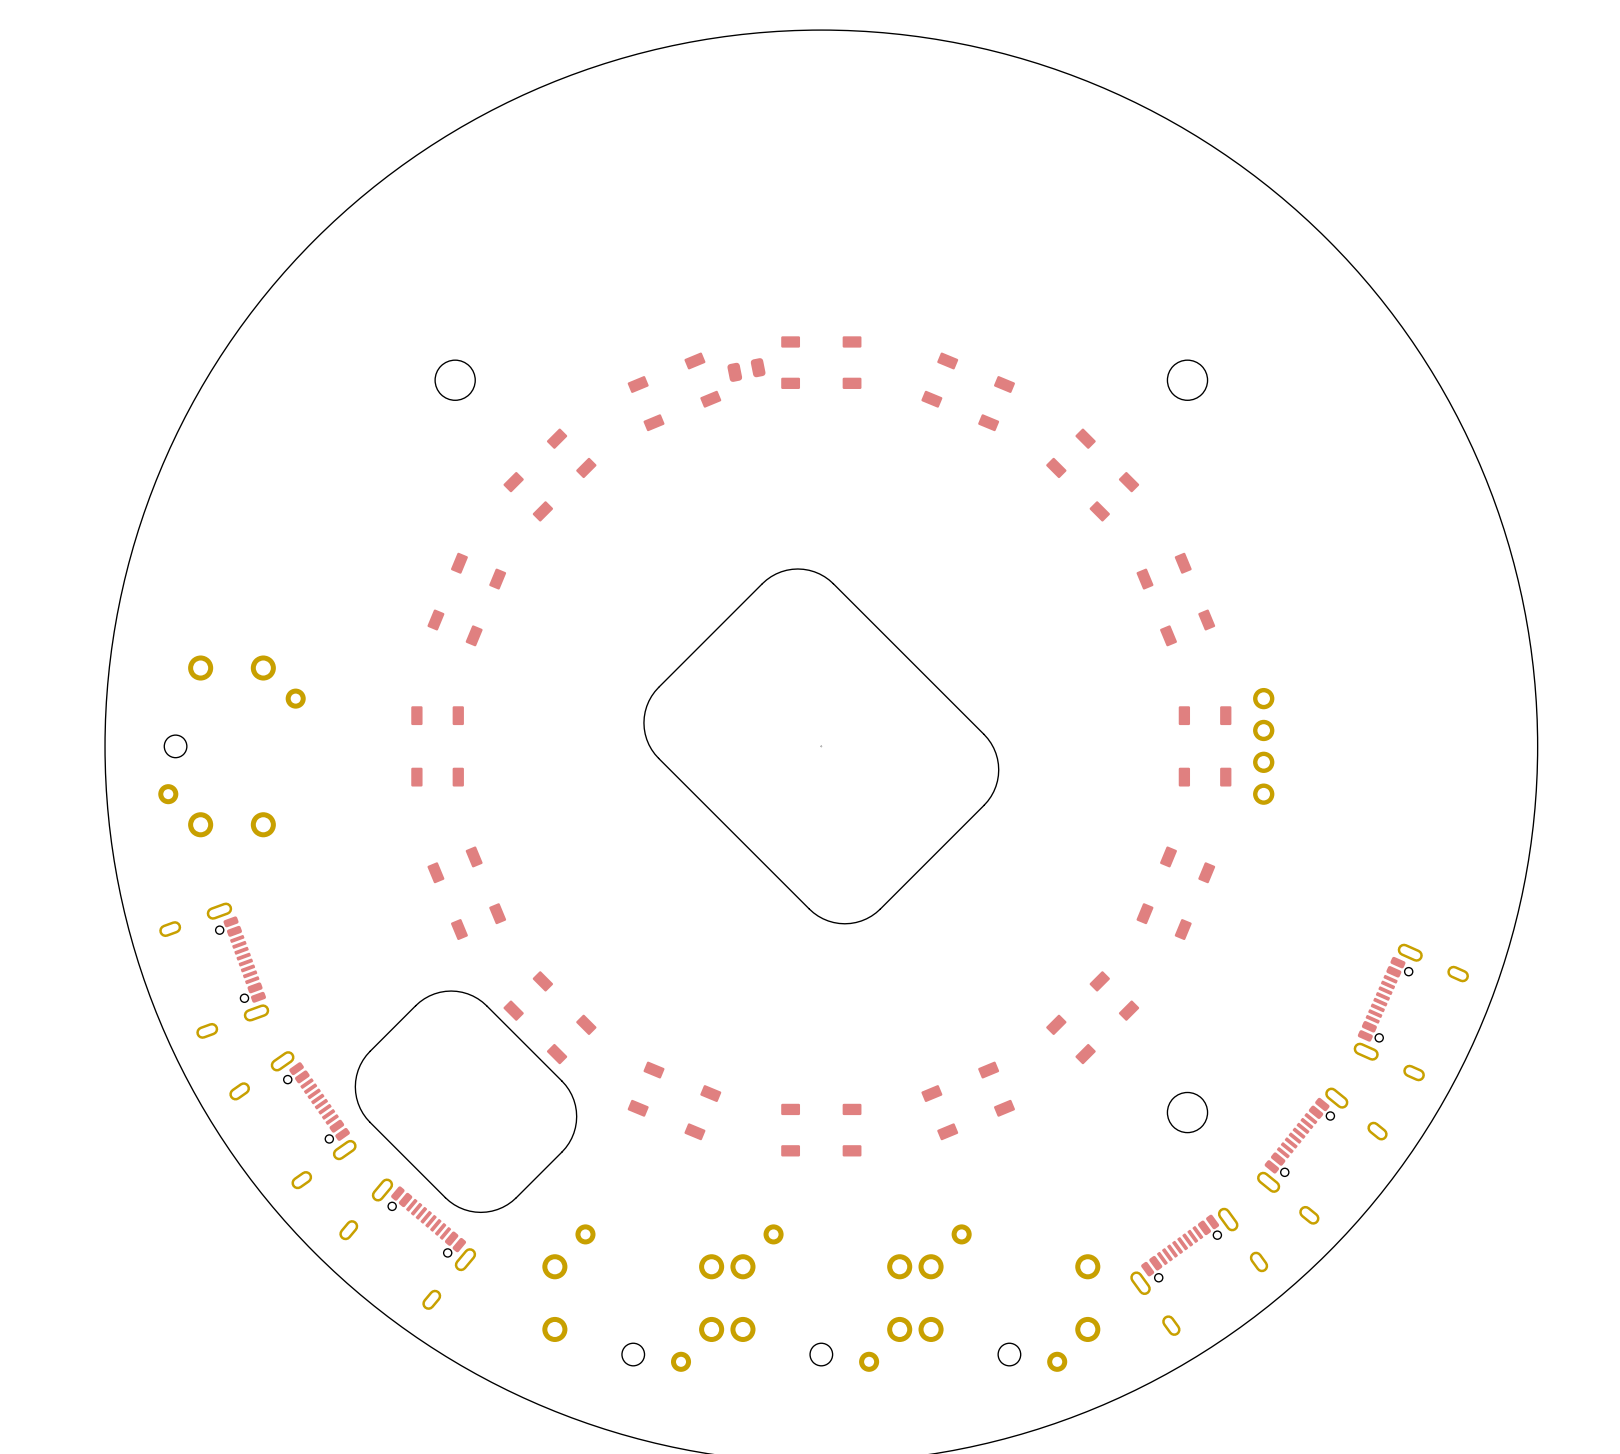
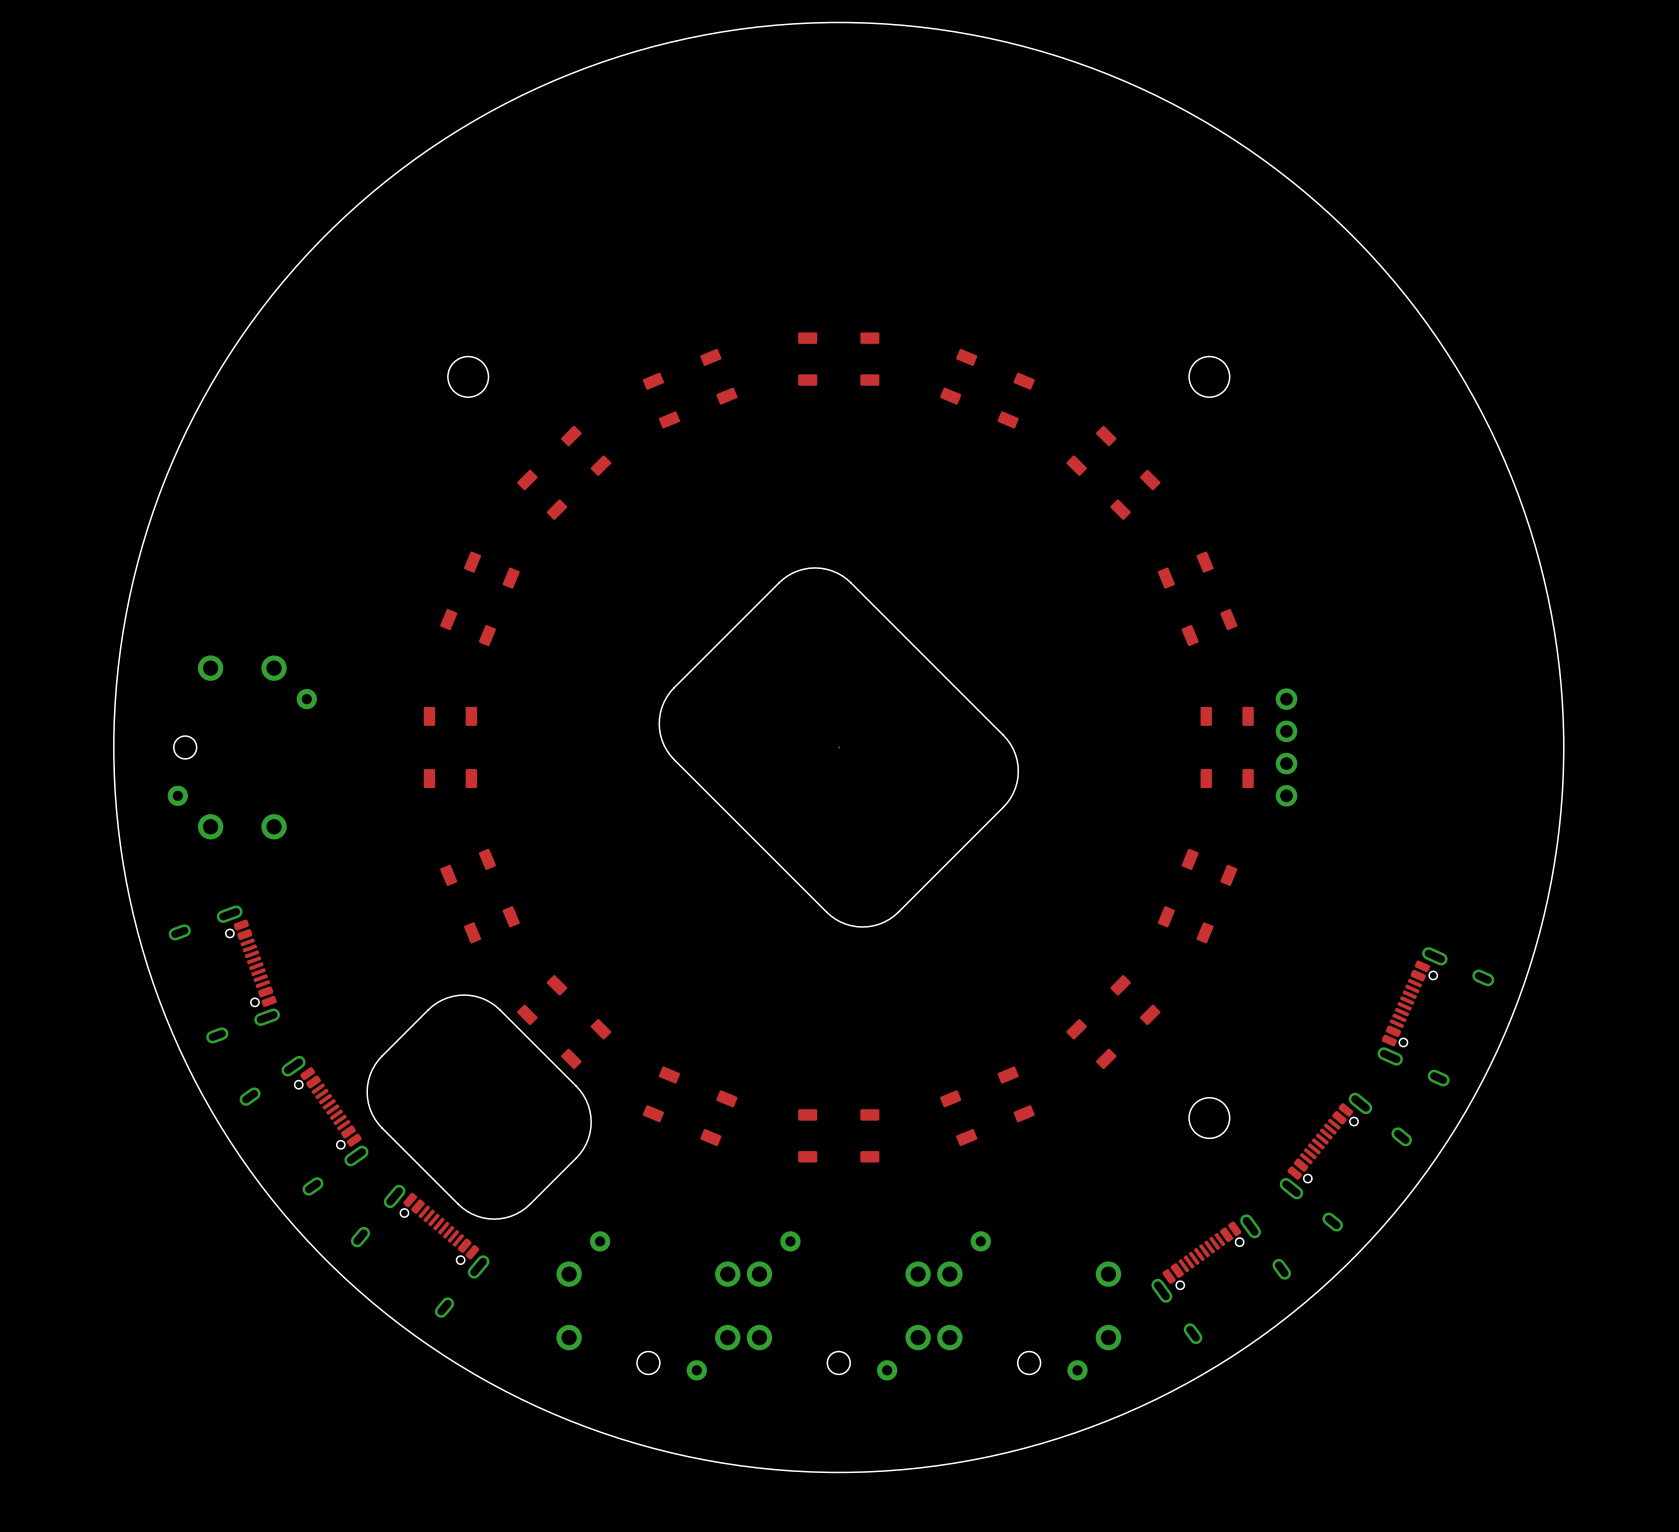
part: (746, 370) -> none

